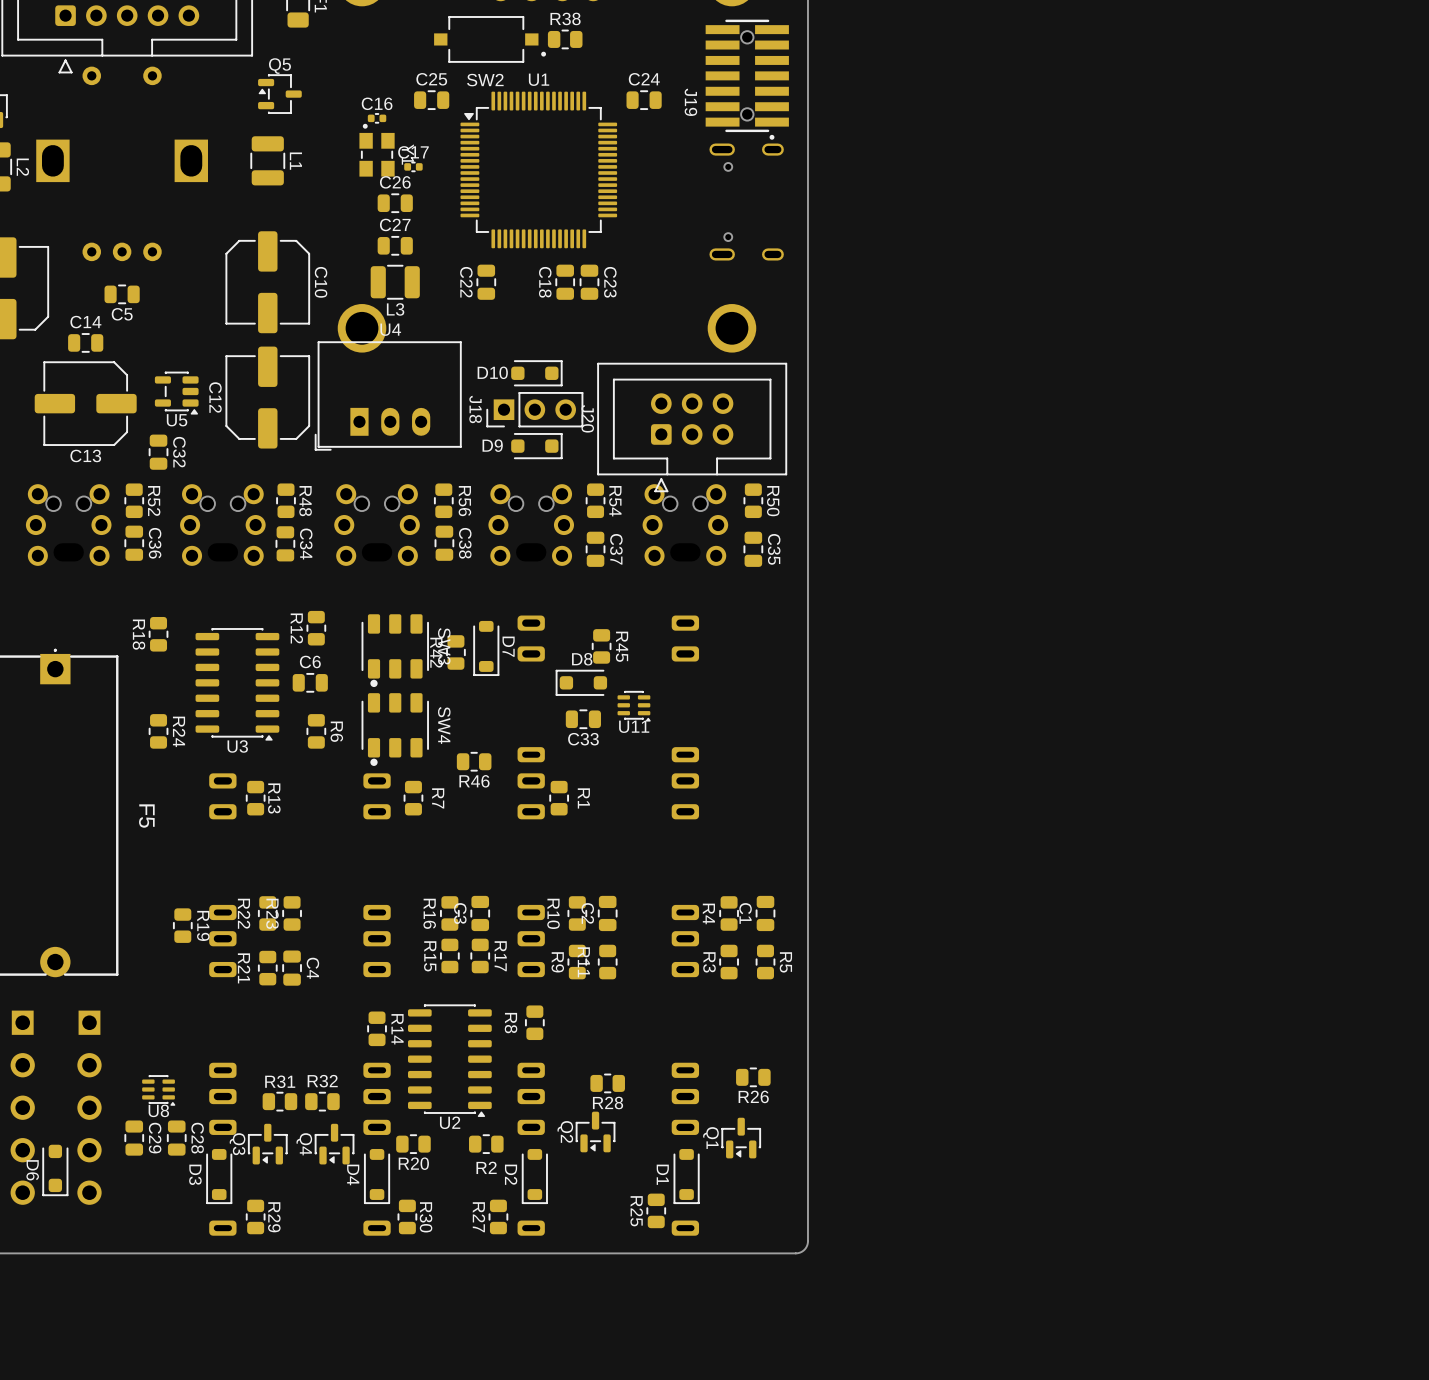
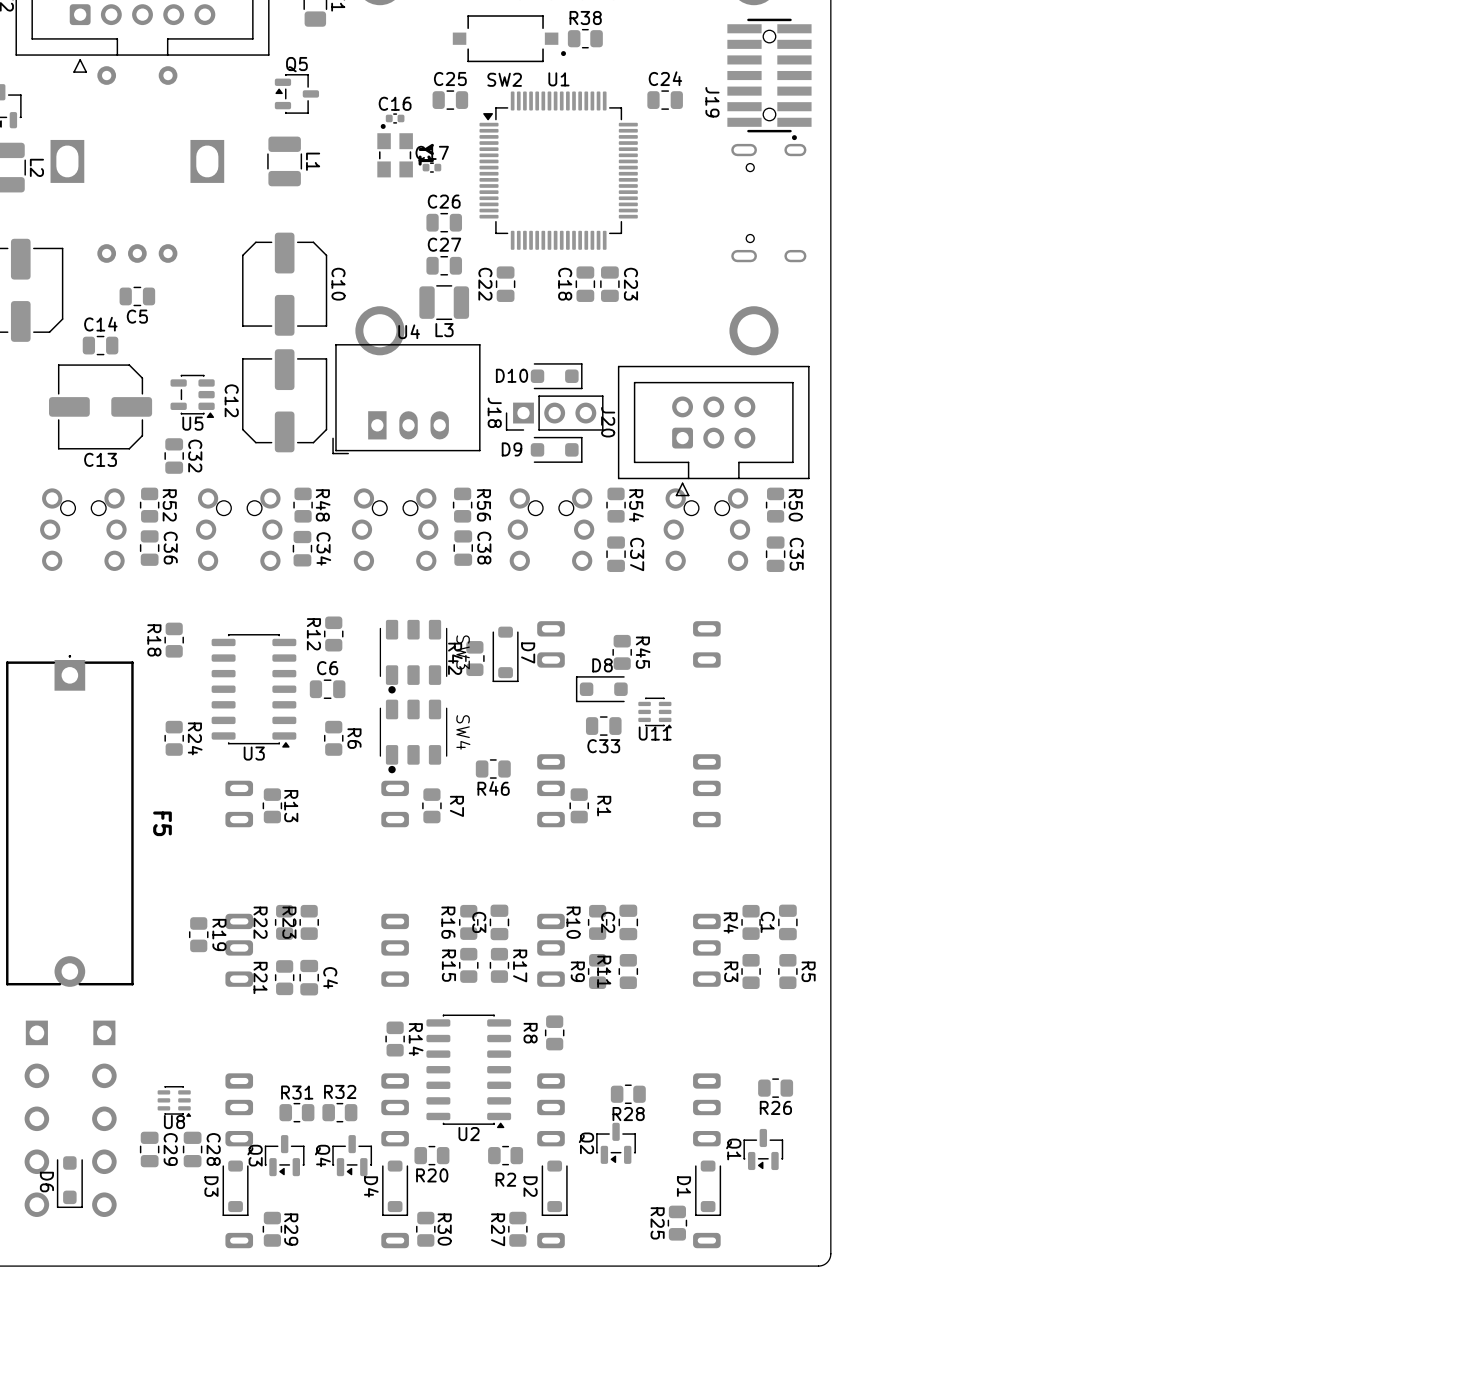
C26 position: (395, 203) -> (444, 222)
C27 position: (395, 245) -> (444, 265)
L3 position: (395, 282) -> (444, 302)

